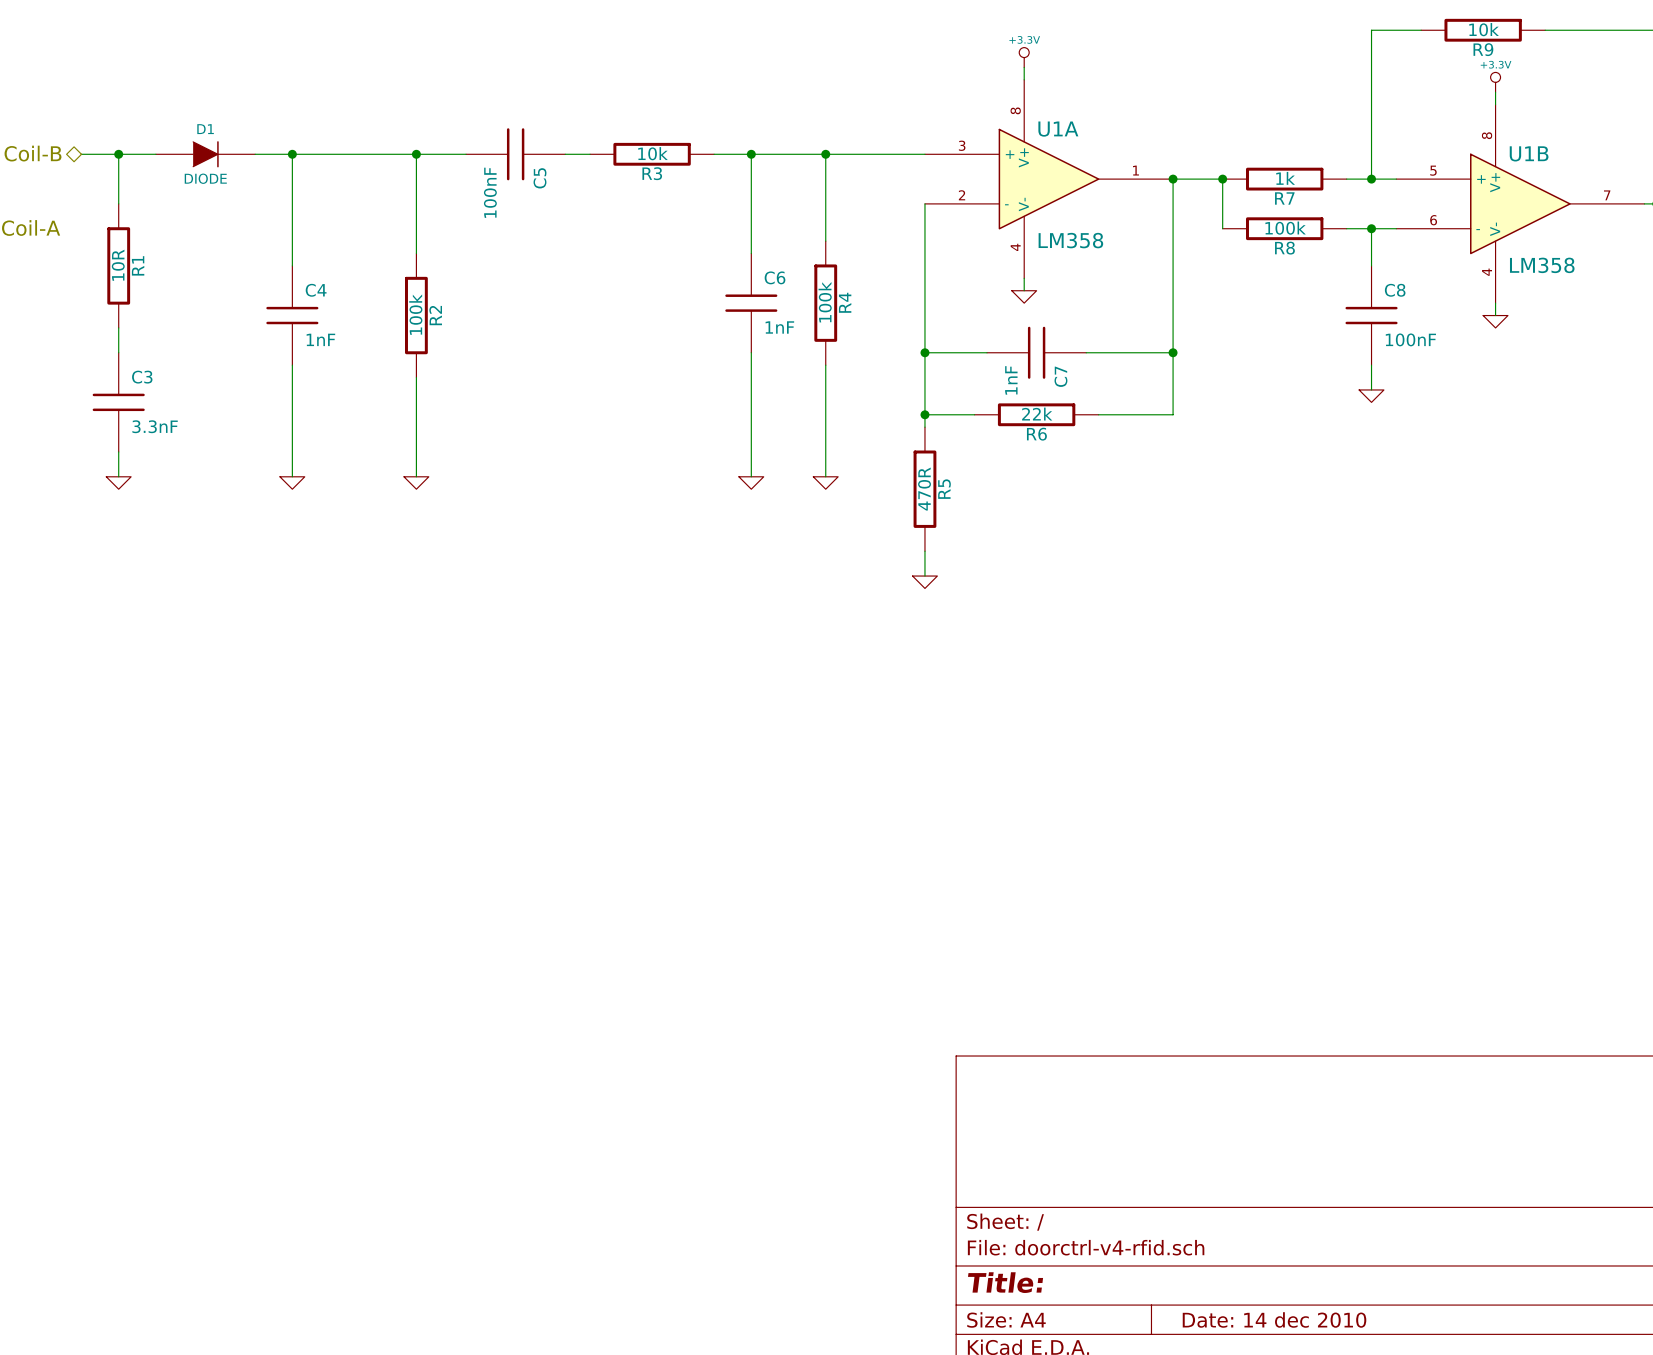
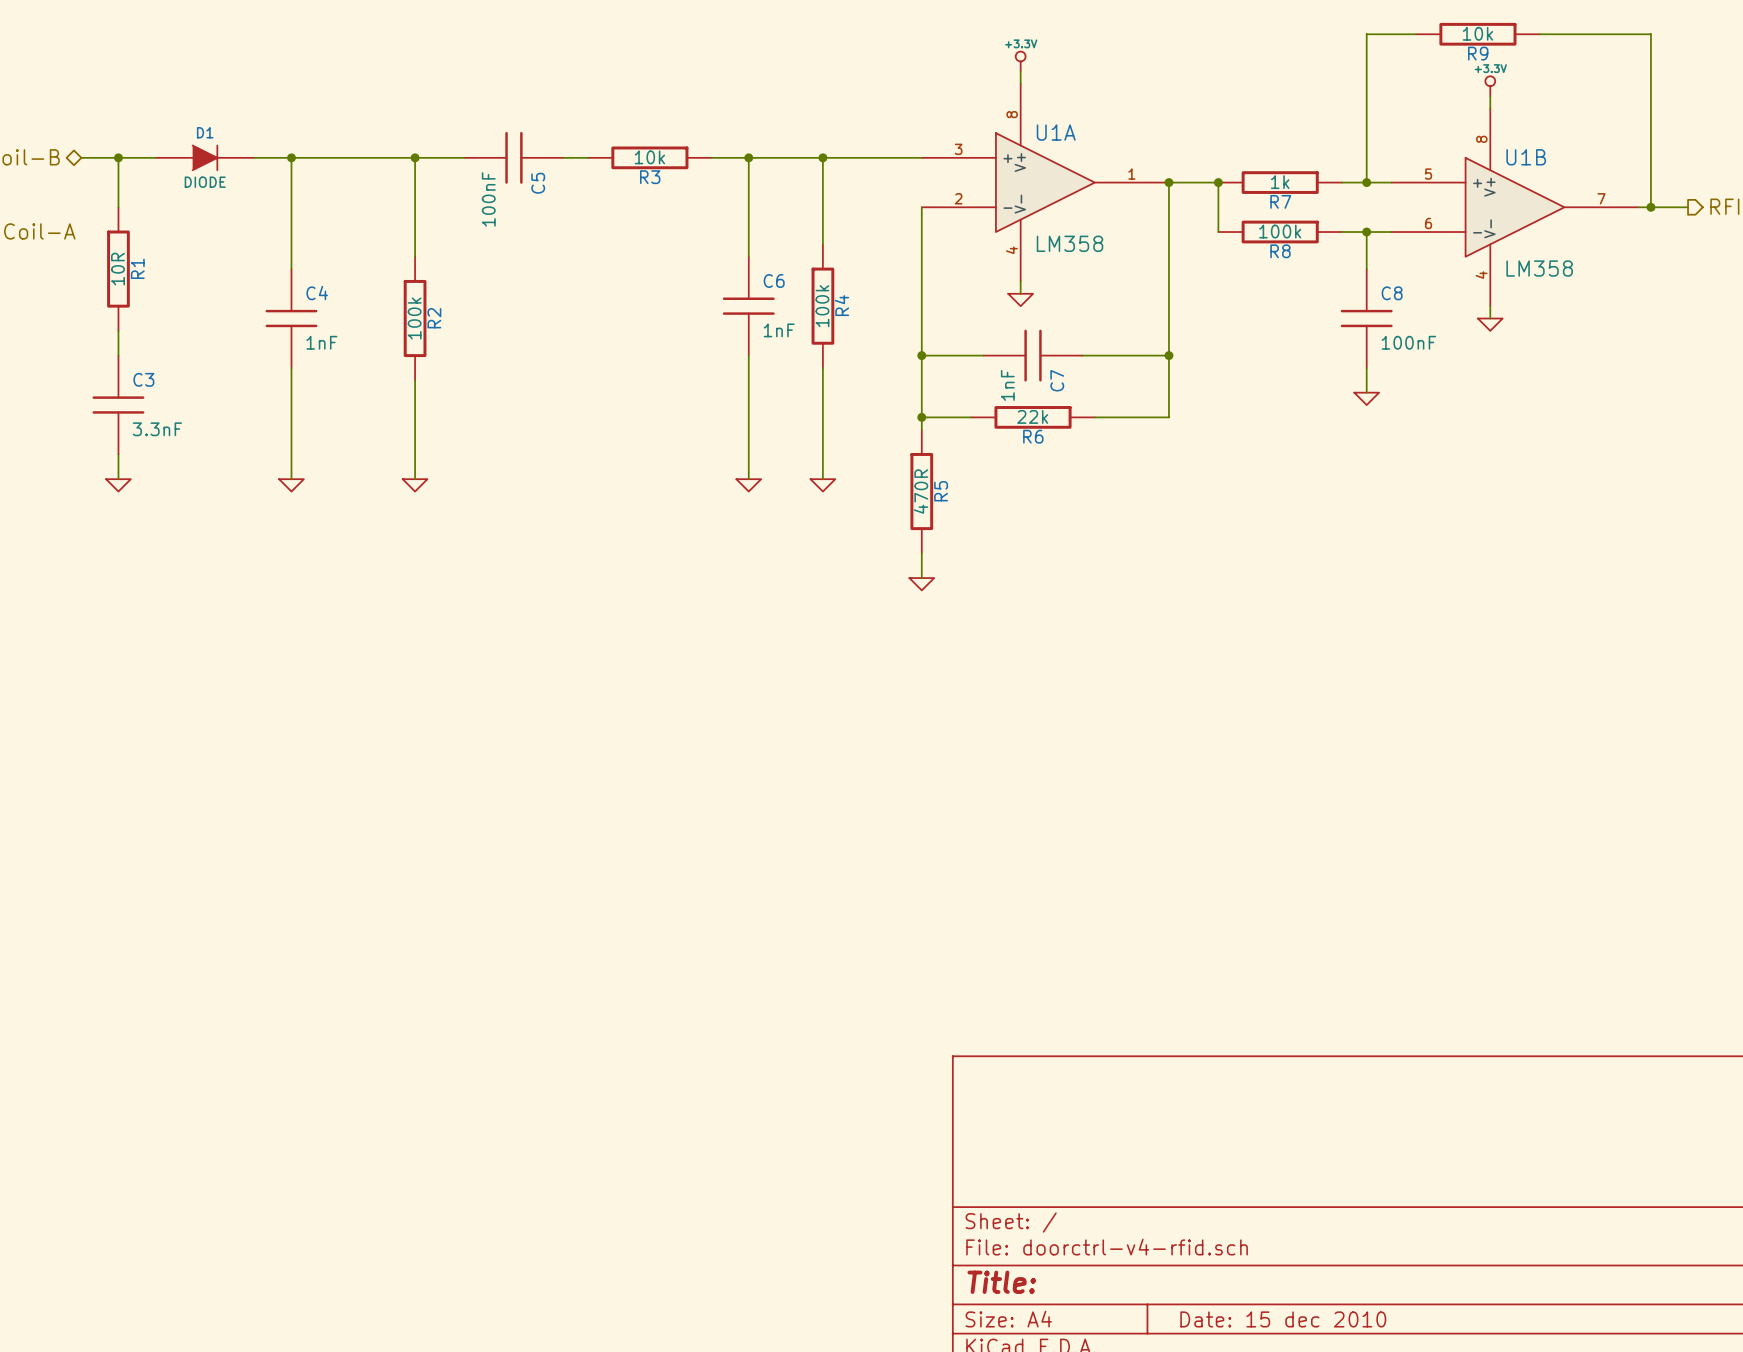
title block: Date: 14 dec 2010 (1274, 1319) -> Date: 15 dec 2010 (1283, 1319)

